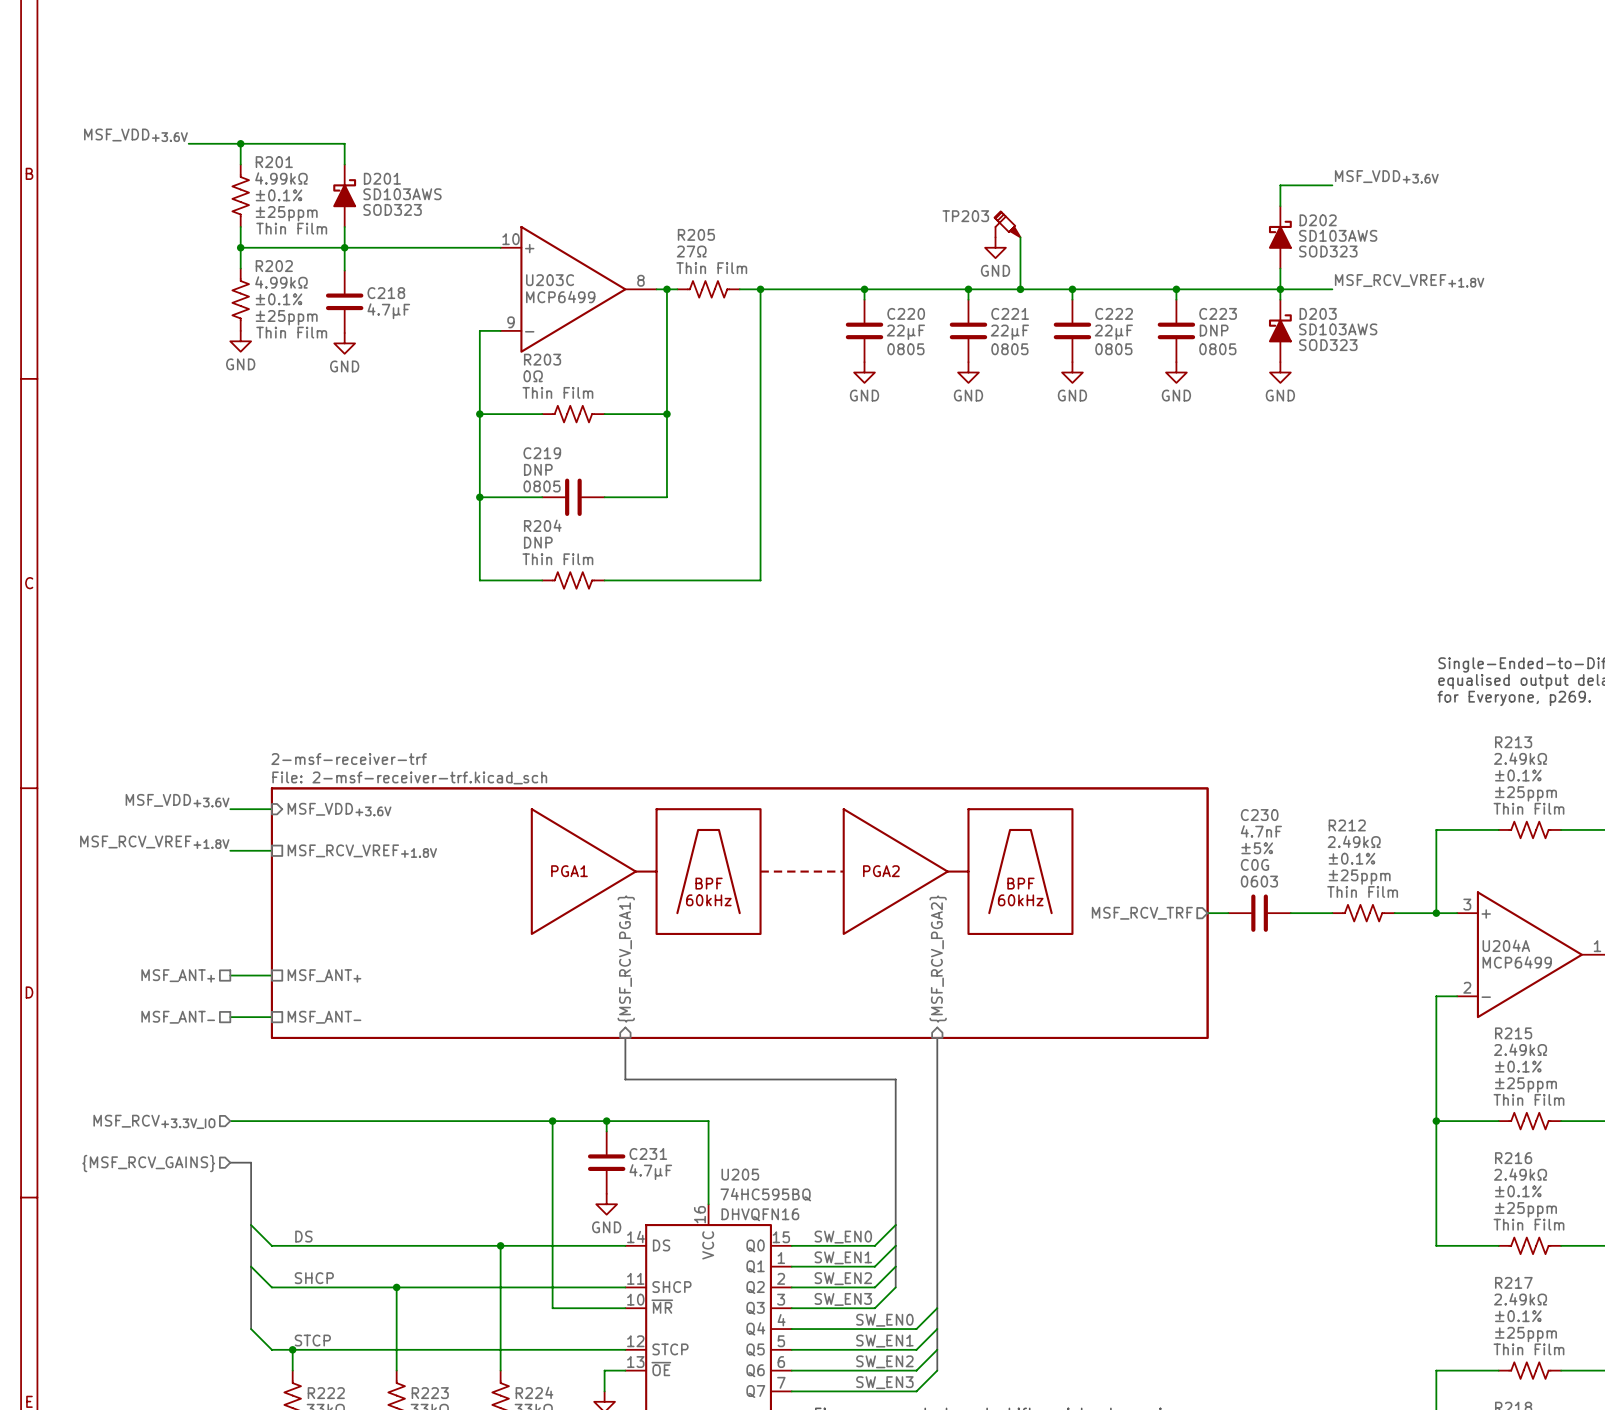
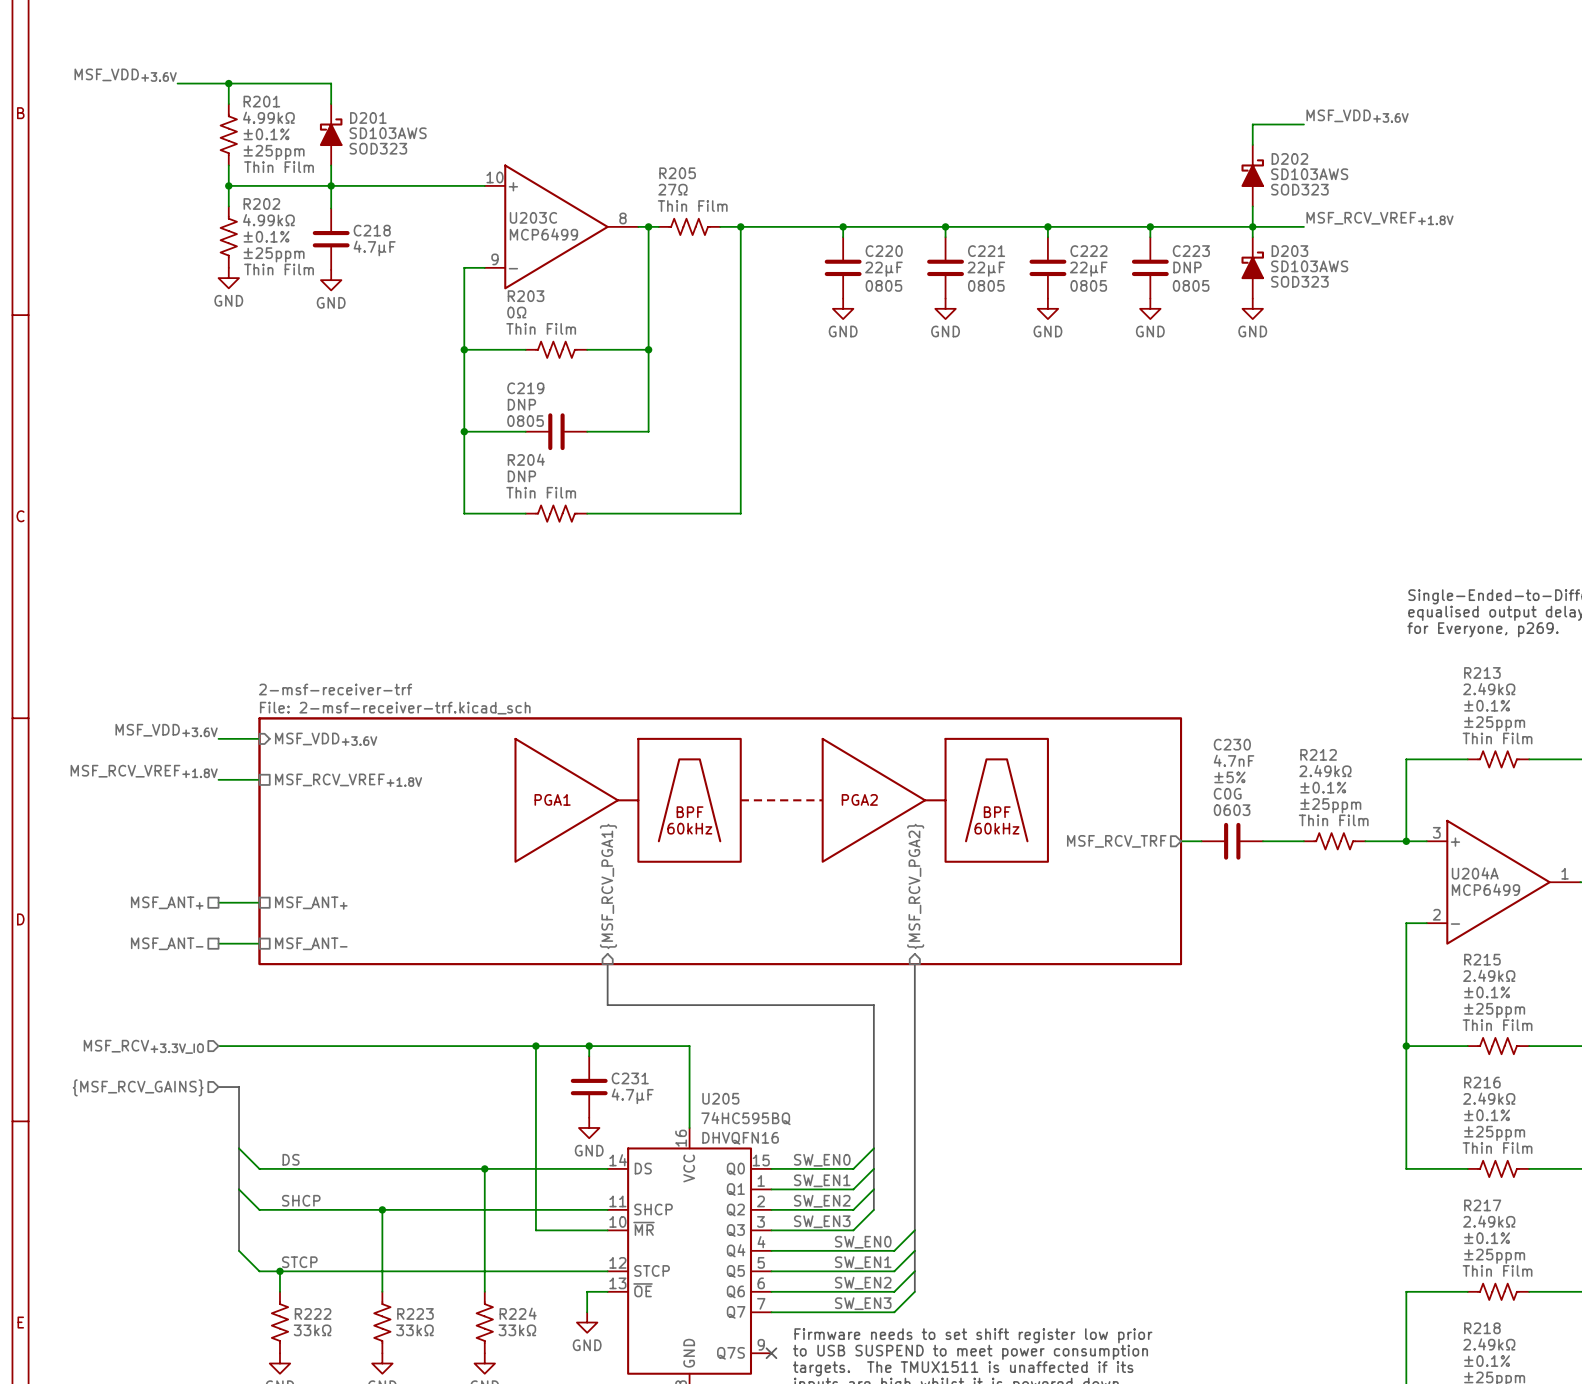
TP203: (1007, 224) -> none
wire: (1020, 237) (1020, 289) -> none
power symbol: GND (995, 247) -> none
junction: (1020, 289) -> none

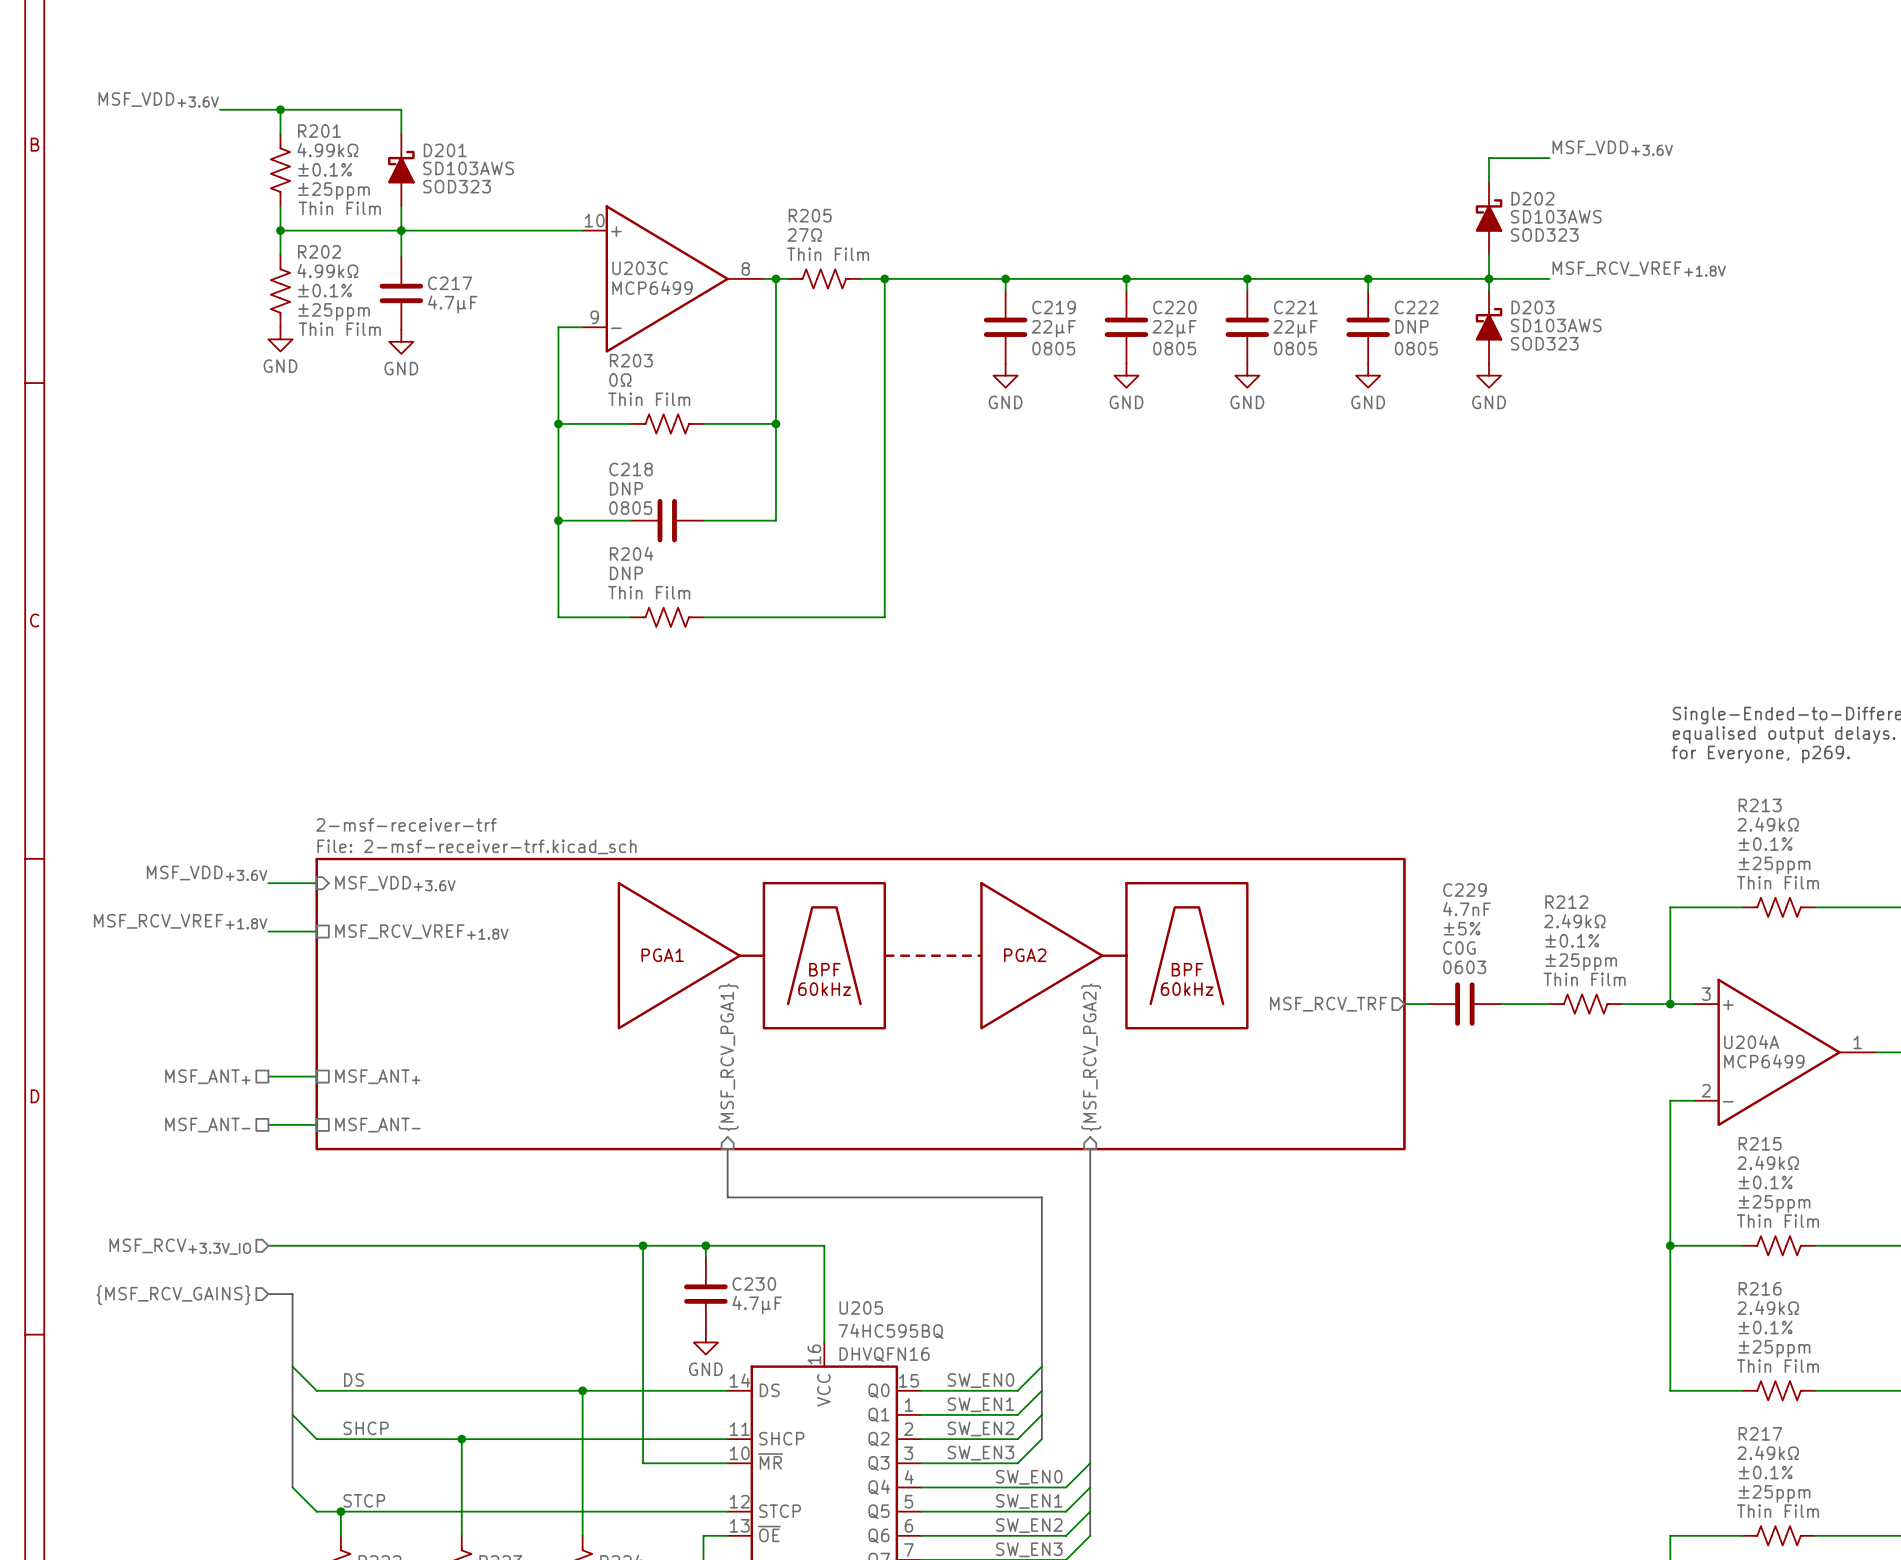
C218 name: C218 (372, 230) -> C217 (450, 283)
C220 name: C220 (884, 251) -> C219 (1054, 307)
C221 name: C221 (986, 251) -> C220 (1174, 307)
C222 name: C222 (1088, 251) -> C221 (1295, 307)
C223 name: C223 (1191, 251) -> C222 (1416, 307)
C219 name: C219 (525, 388) -> C218 (631, 469)
C230 name: C230 (1232, 744) -> C229 (1464, 890)
C231 name: C231 (630, 1078) -> C230 (754, 1283)

